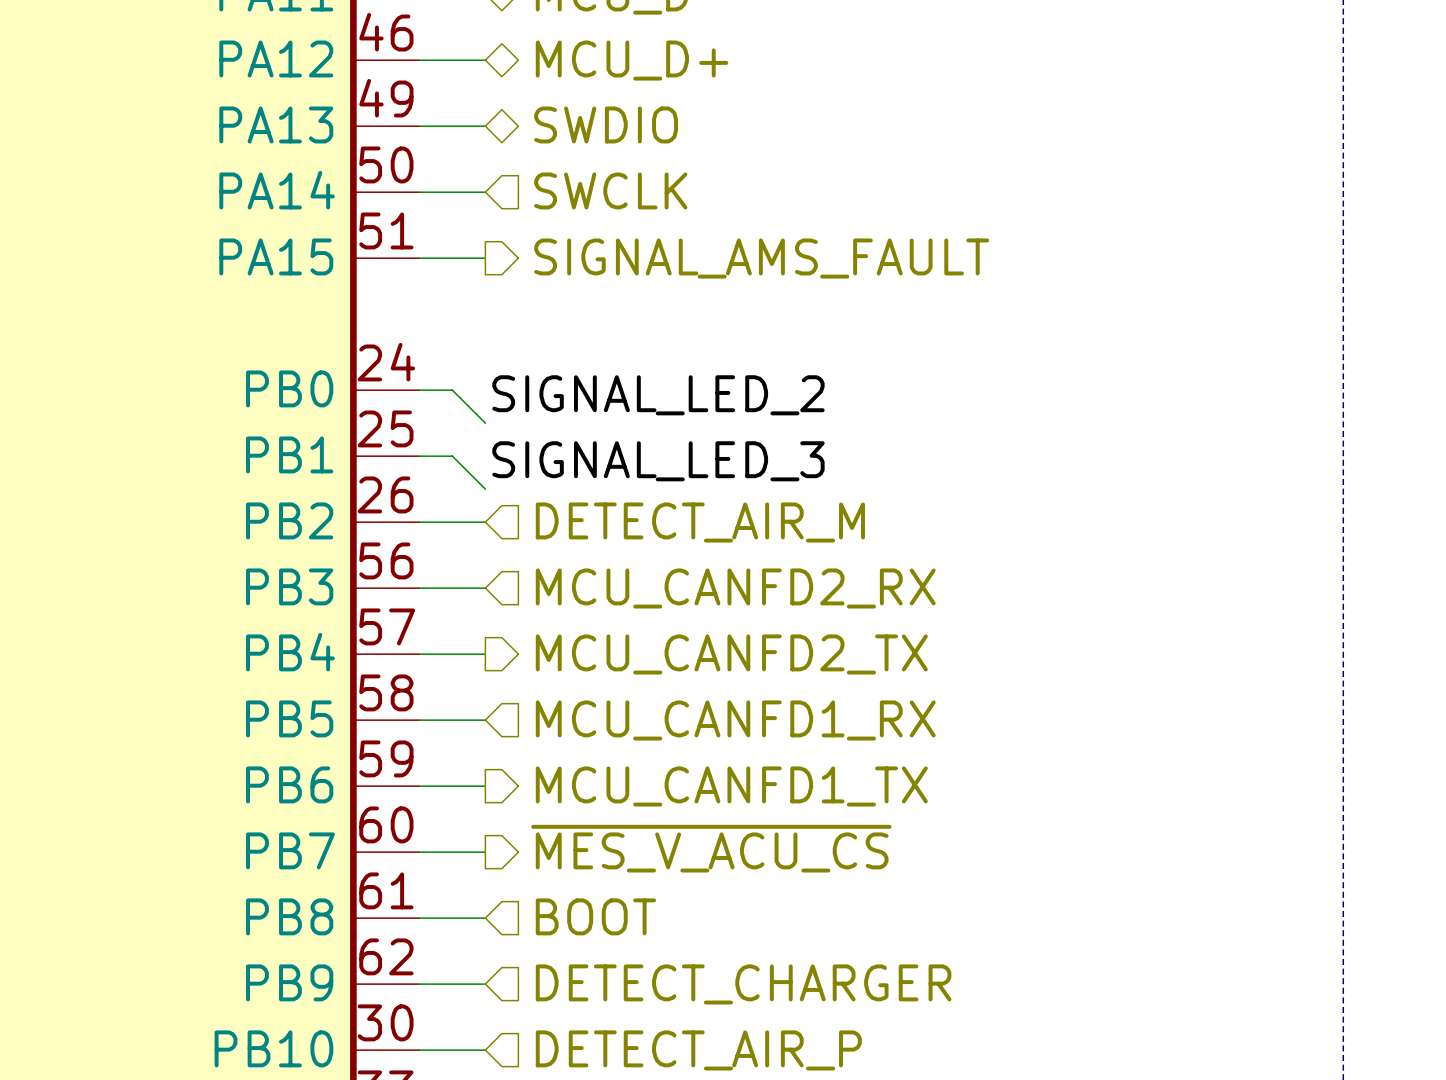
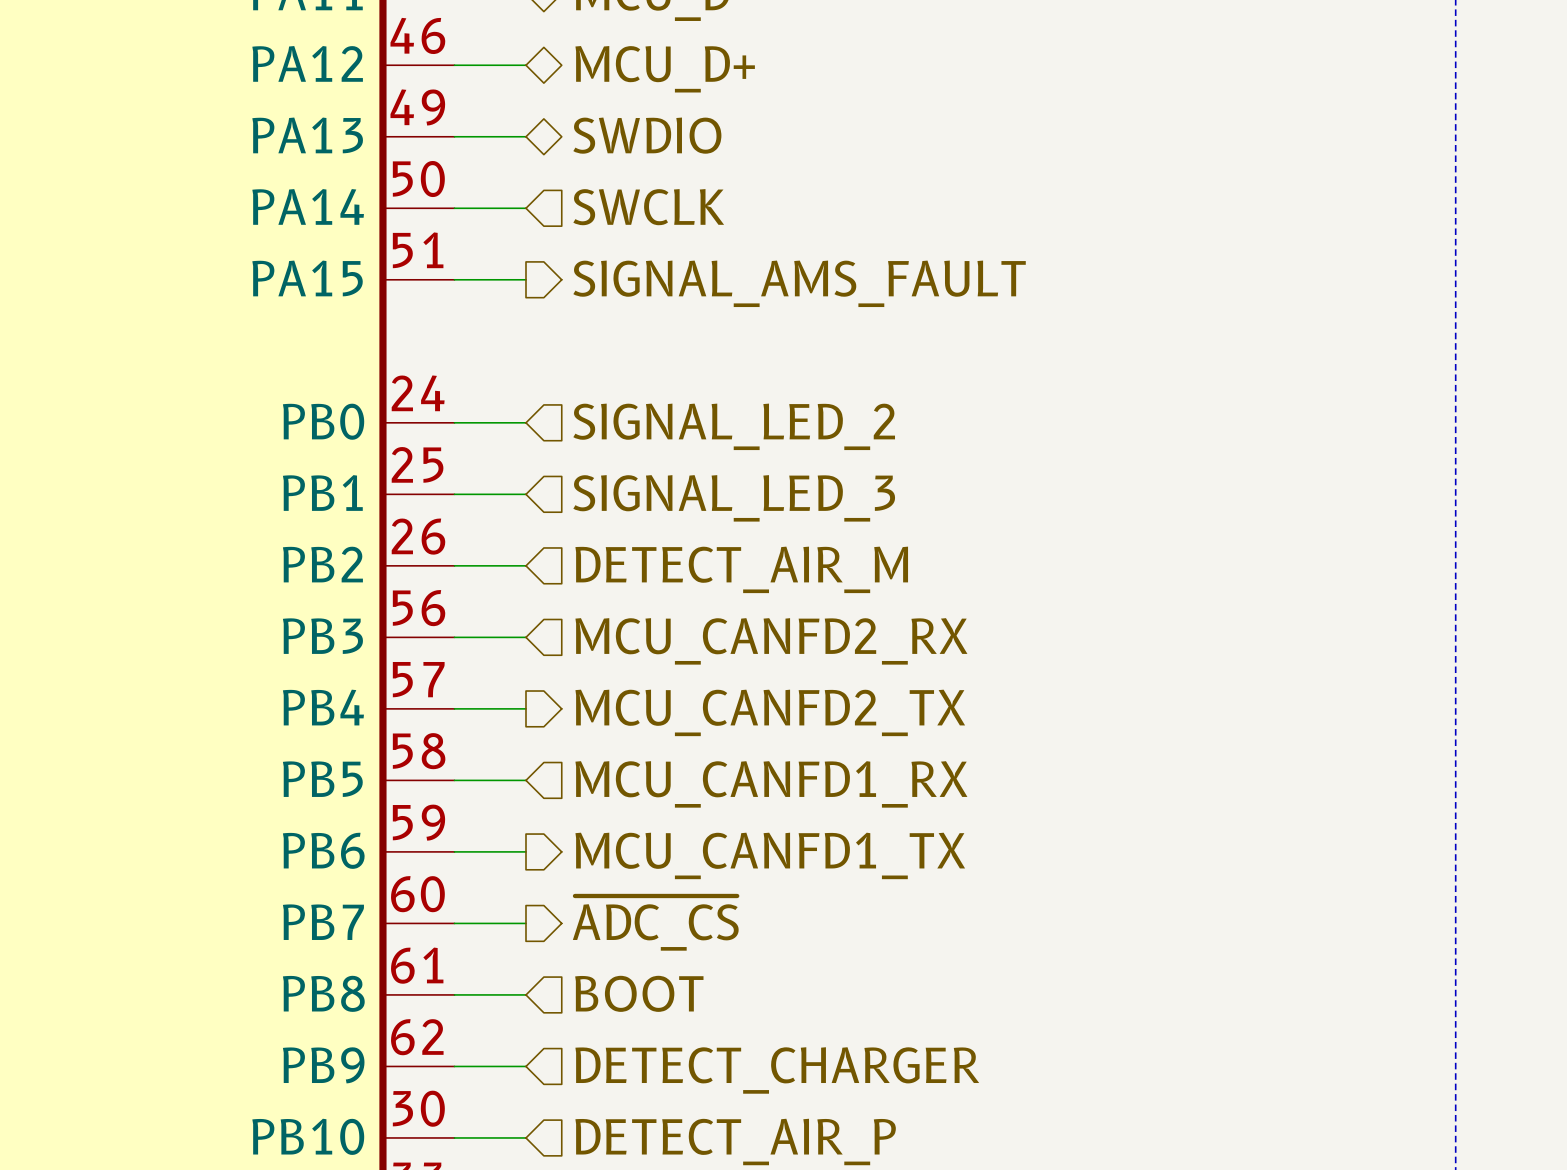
wire: (452, 390) (485, 423) -> (490, 422) (525, 422)
hierarchical label: none -> SIGNAL_LED_2 (734, 426)
label: SIGNAL_LED_2 (658, 395) -> none
wire: (452, 456) (485, 489) -> (490, 494) (525, 494)
hierarchical label: none -> SIGNAL_LED_3 (734, 498)
label: SIGNAL_LED_3 (658, 461) -> none
hierarchical label: ~{MES_V_ACU_CS} (711, 848) -> ~{ADC_CS} (655, 923)

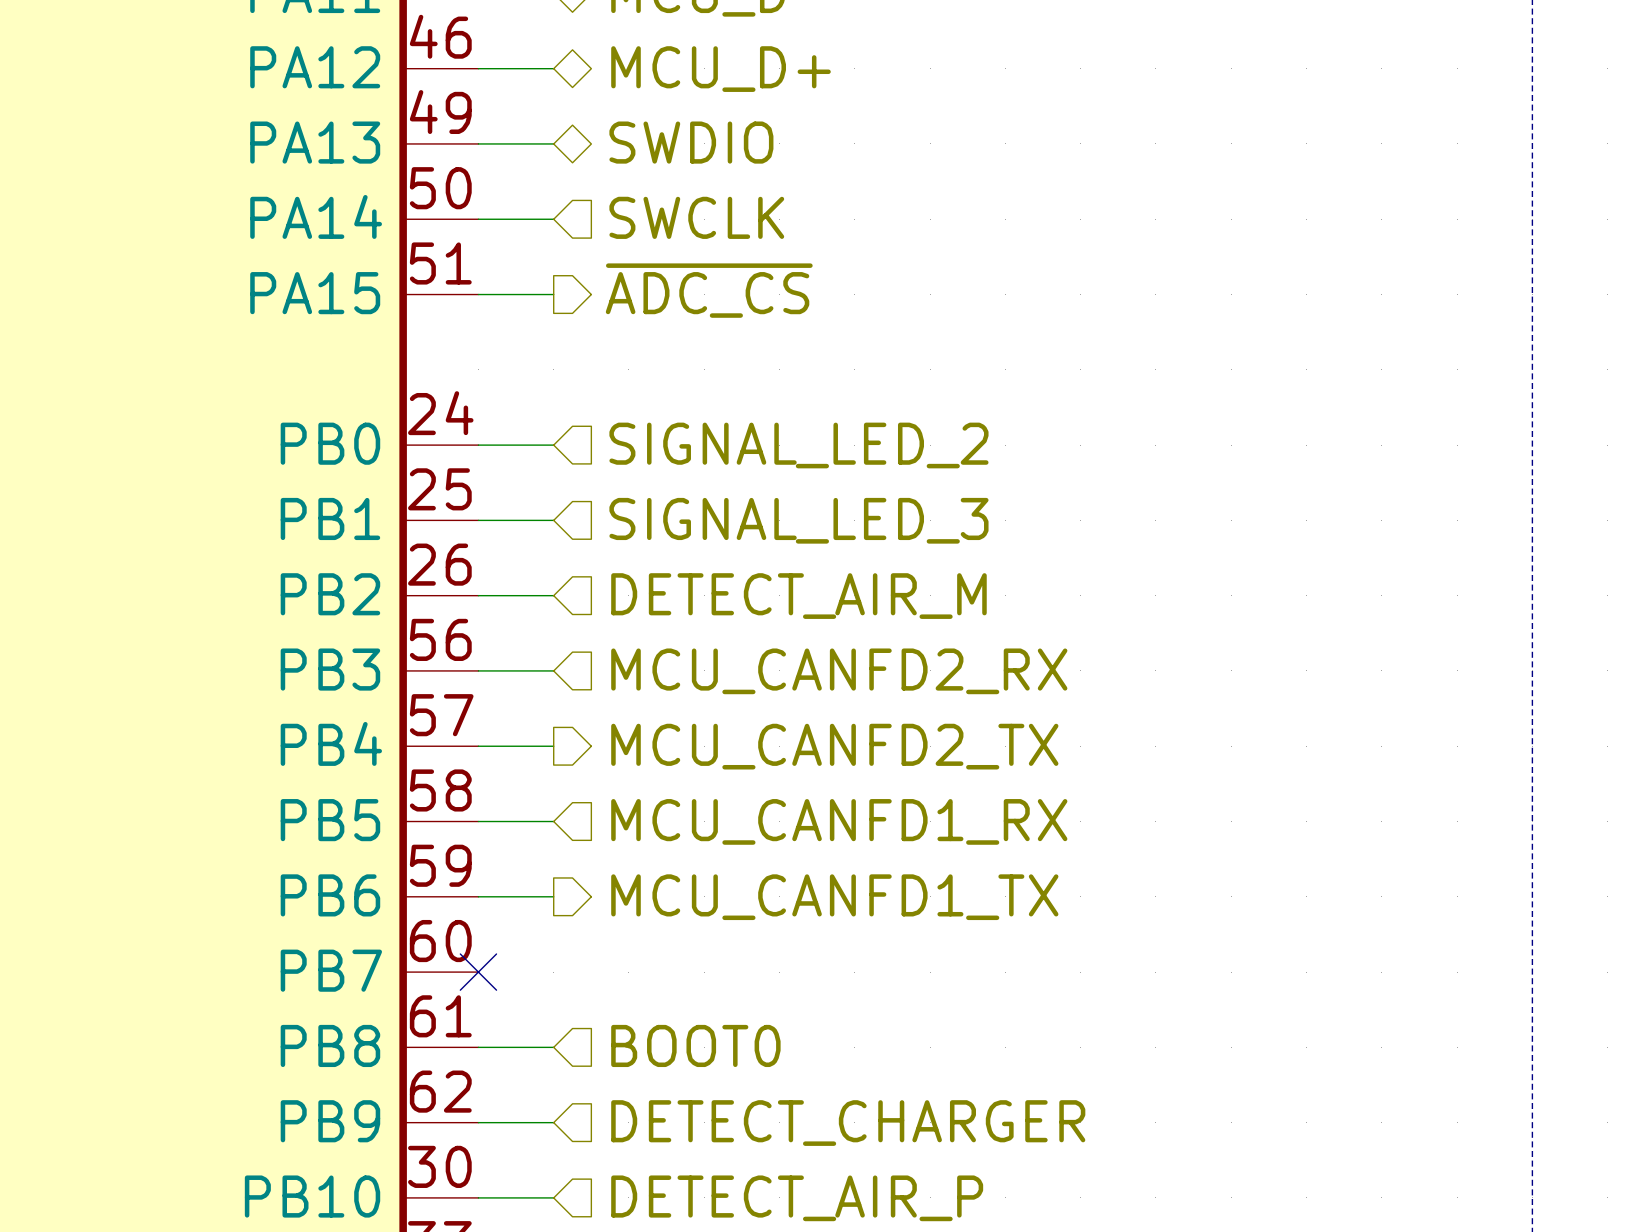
hierarchical label: SIGNAL_AMS_FAULT (799, 283) -> ~{ADC_CS} (709, 290)
wire: (454, 923) (525, 923) -> none
no-connect mark: none -> (478, 972)
hierarchical label: ~{ADC_CS} (655, 923) -> none
hierarchical label: BOOT (639, 993) -> BOOT0 (695, 1045)

